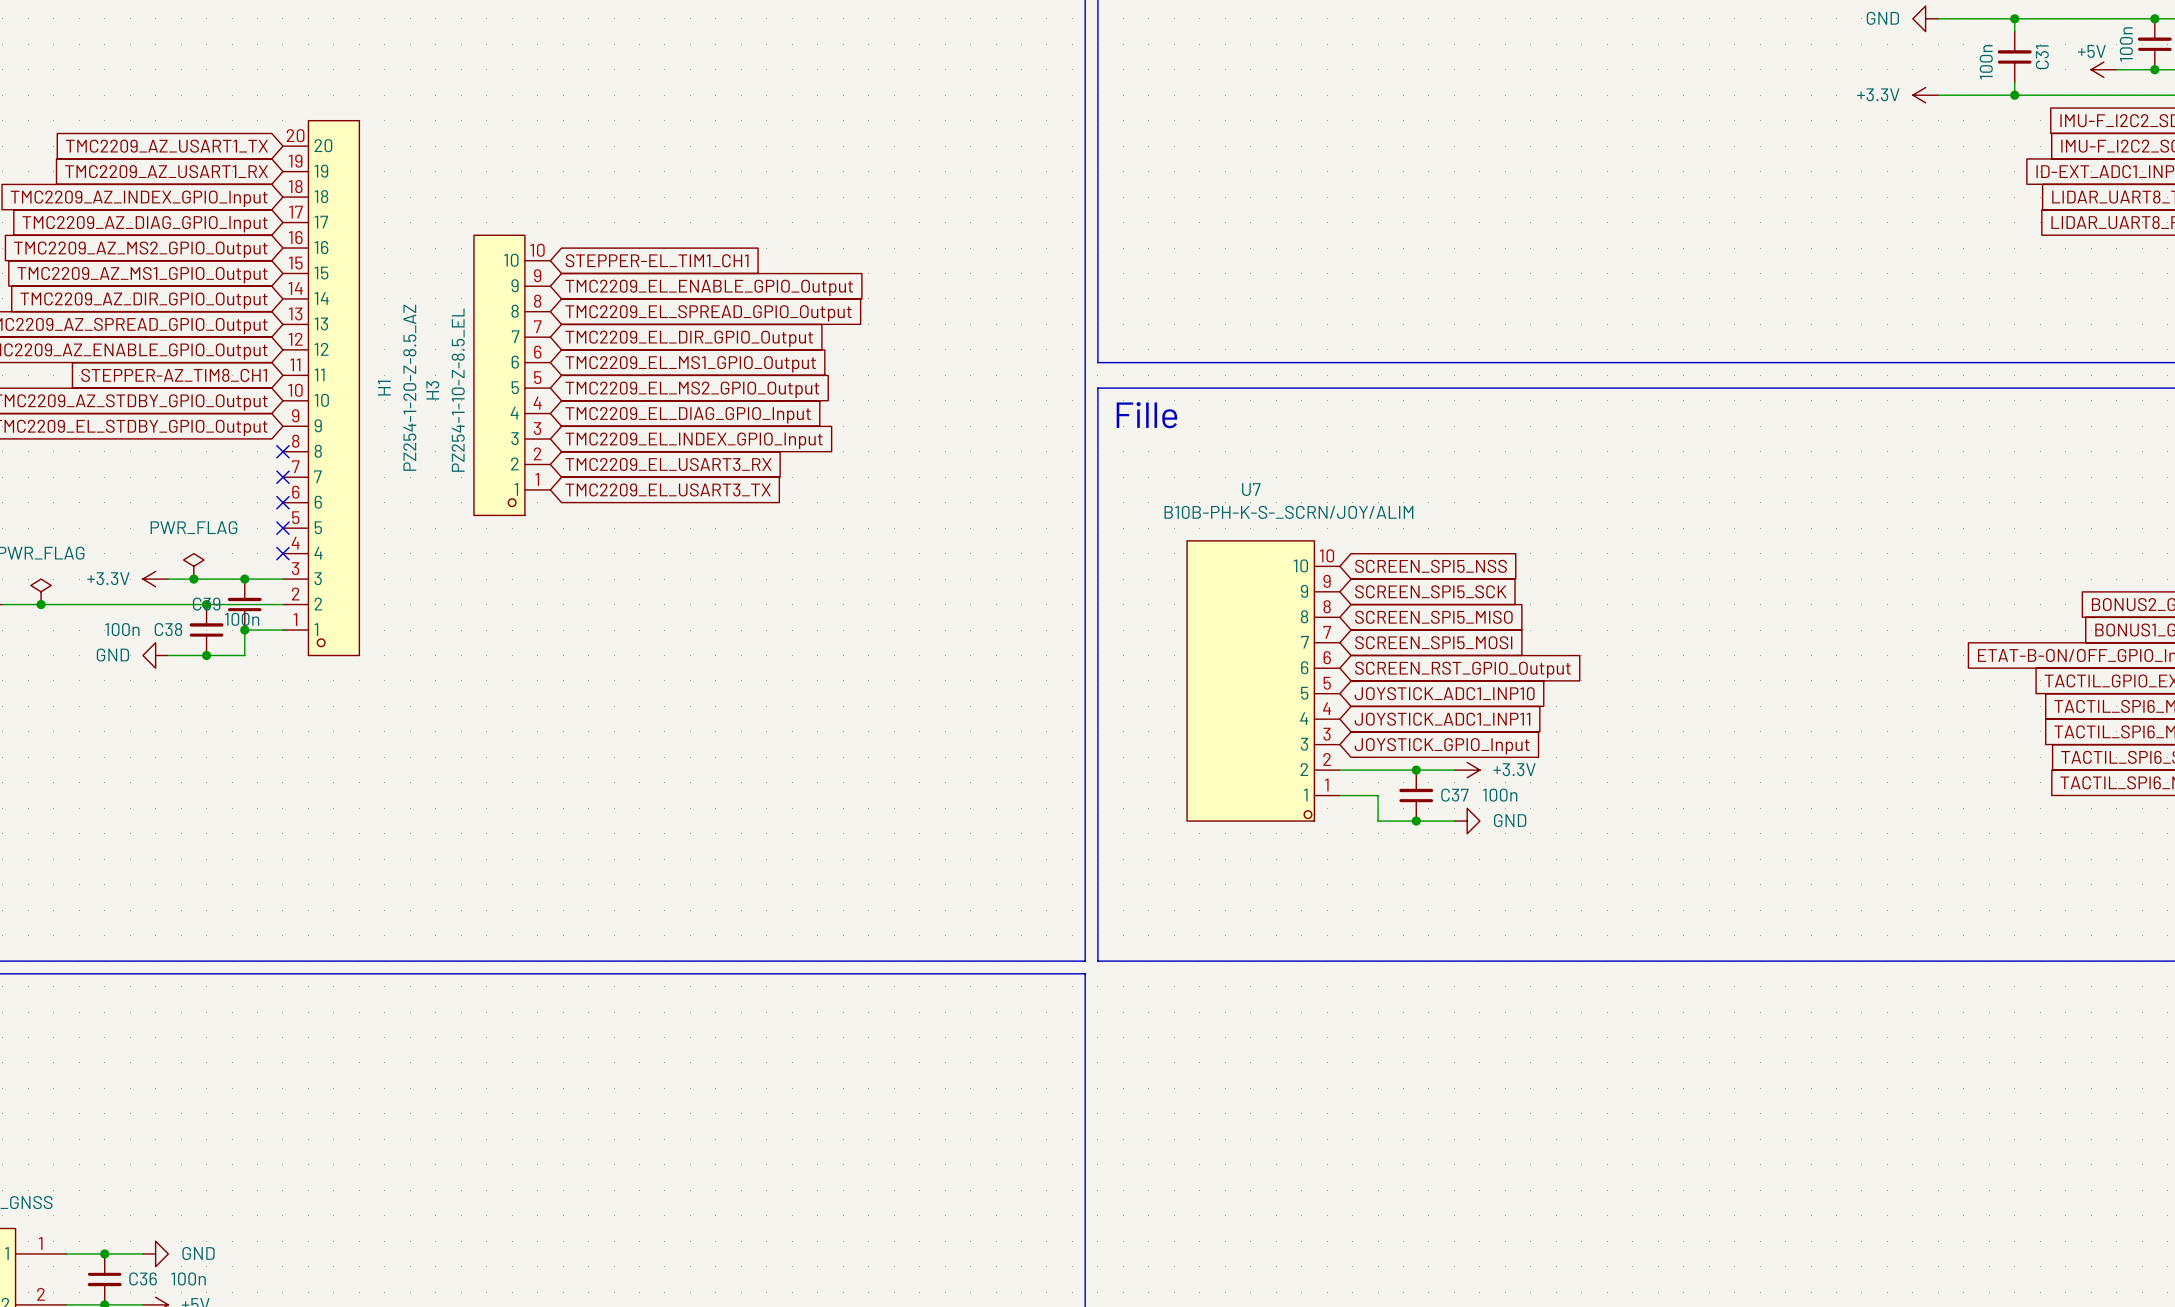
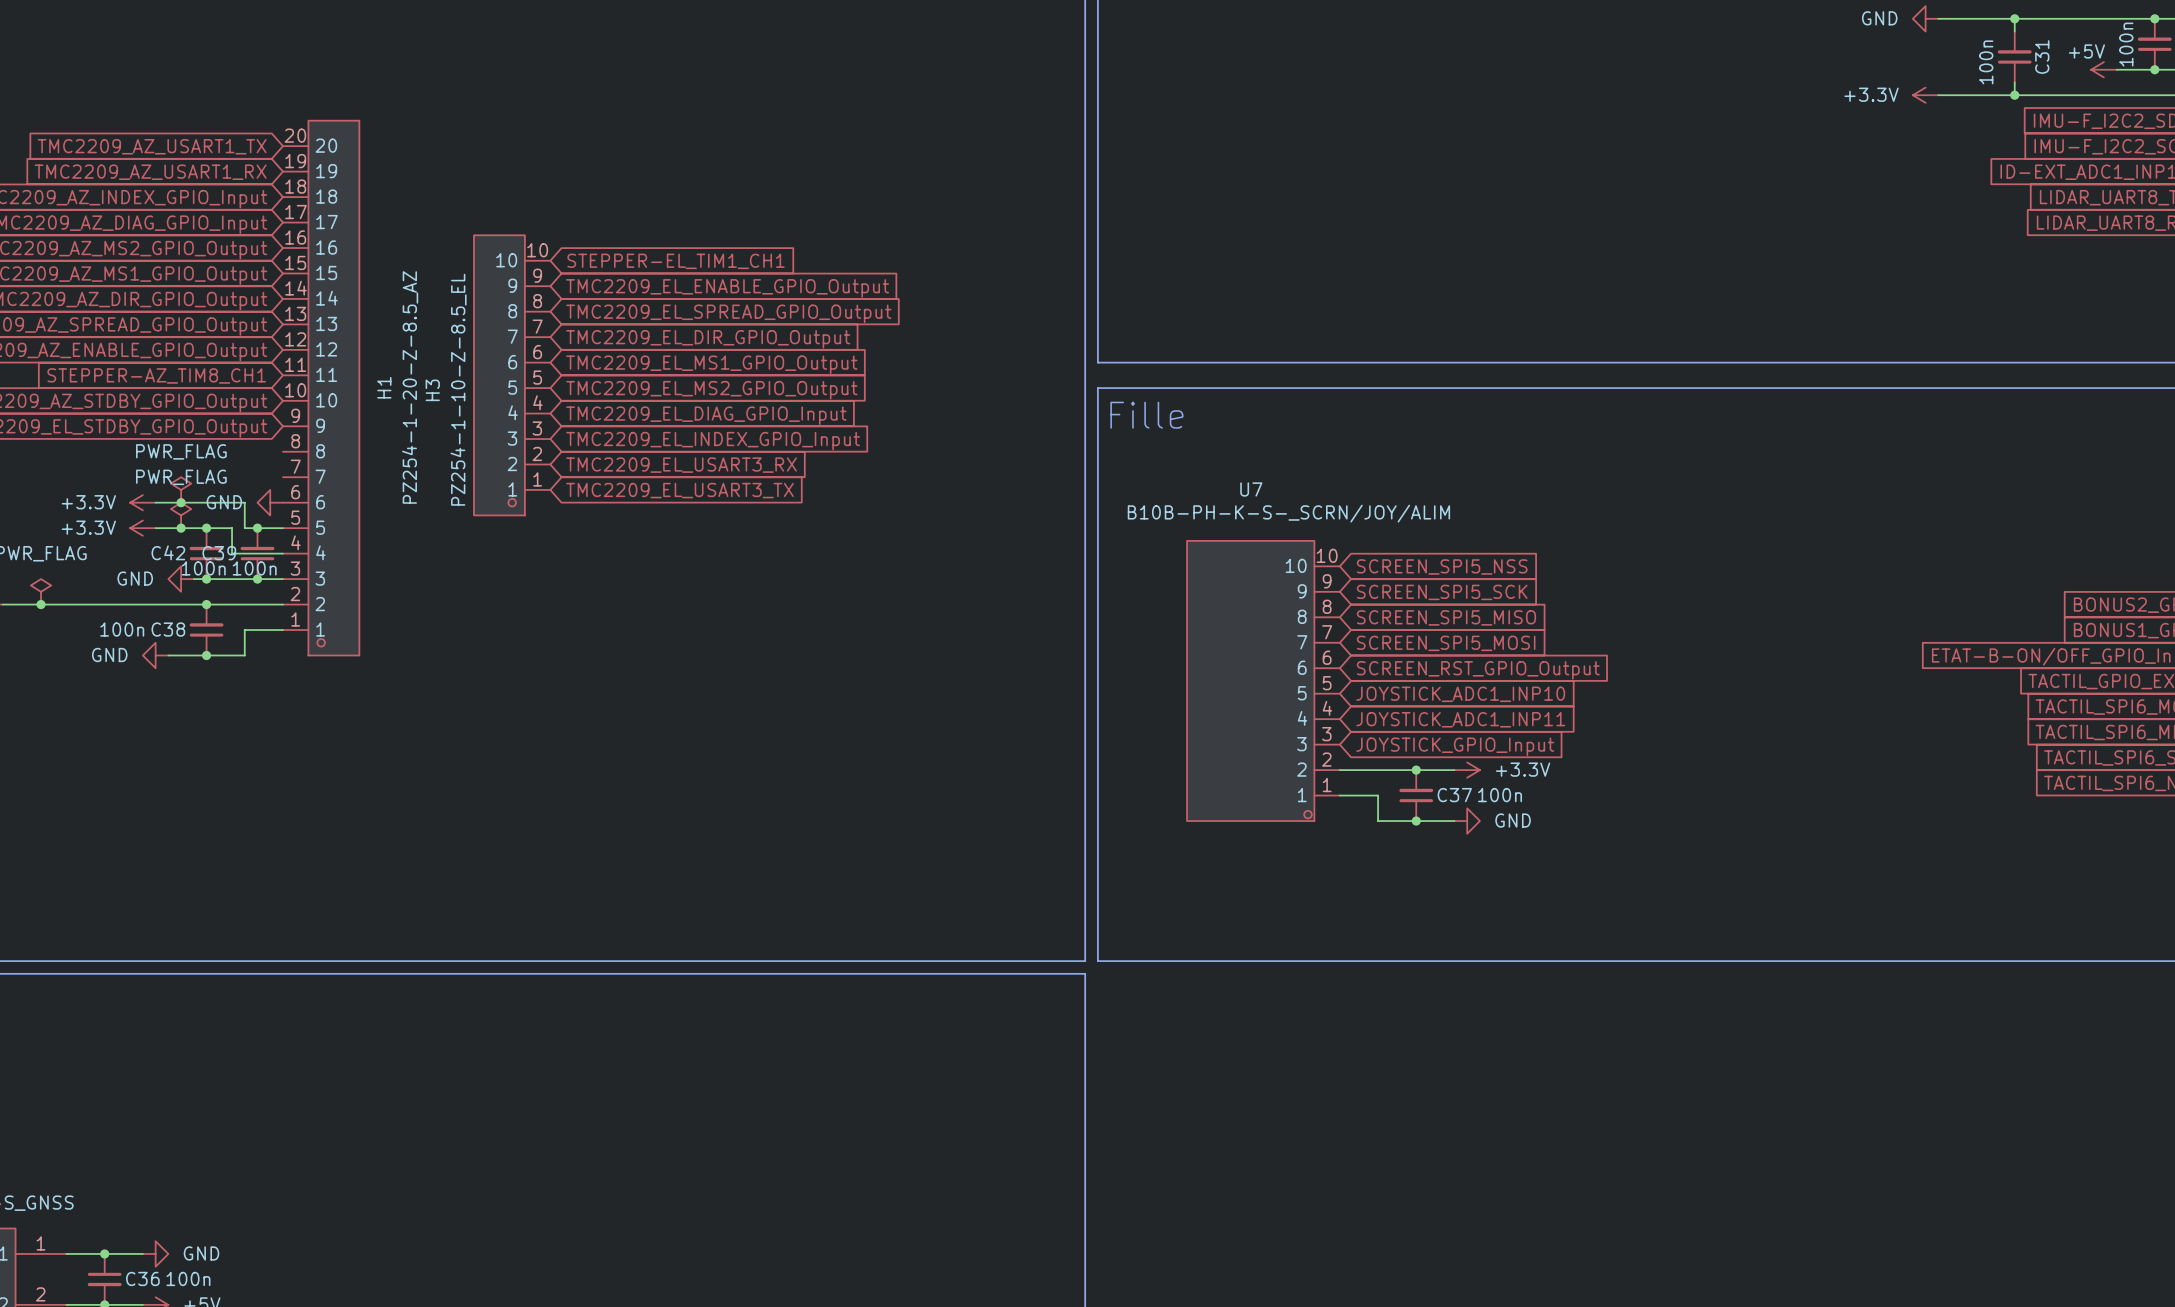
no-connect mark: (282, 451) -> none
no-connect mark: (282, 477) -> none
power symbol: none -> PWR_FLAG (181, 489)
power symbol: none -> +3.3V (142, 502)
wire: none -> (155, 502) (244, 502) (244, 528) (282, 528)
junction: none -> (181, 502)
power symbol: none -> GND (270, 502)
no-connect mark: (282, 502) -> none
power symbol: none -> PWR_FLAG (181, 515)
power symbol: none -> +3.3V (142, 528)
wire: none -> (155, 528) (232, 528) (232, 553) (282, 553)
junction: none -> (181, 528)
junction: none -> (206, 528)
junction: none -> (257, 528)
no-connect mark: (282, 528) -> none
C42: none -> 100n (206, 553)
no-connect mark: (282, 553) -> none
power symbol: PWR_FLAG (193, 566) -> none
power symbol: +3.3V (155, 579) -> none
power symbol: none -> GND (181, 579)
junction position: (193, 579) -> (206, 579)
junction position: (244, 579) -> (257, 579)
C39 position: (244, 604) -> (257, 553)
junction: (244, 630) -> none

